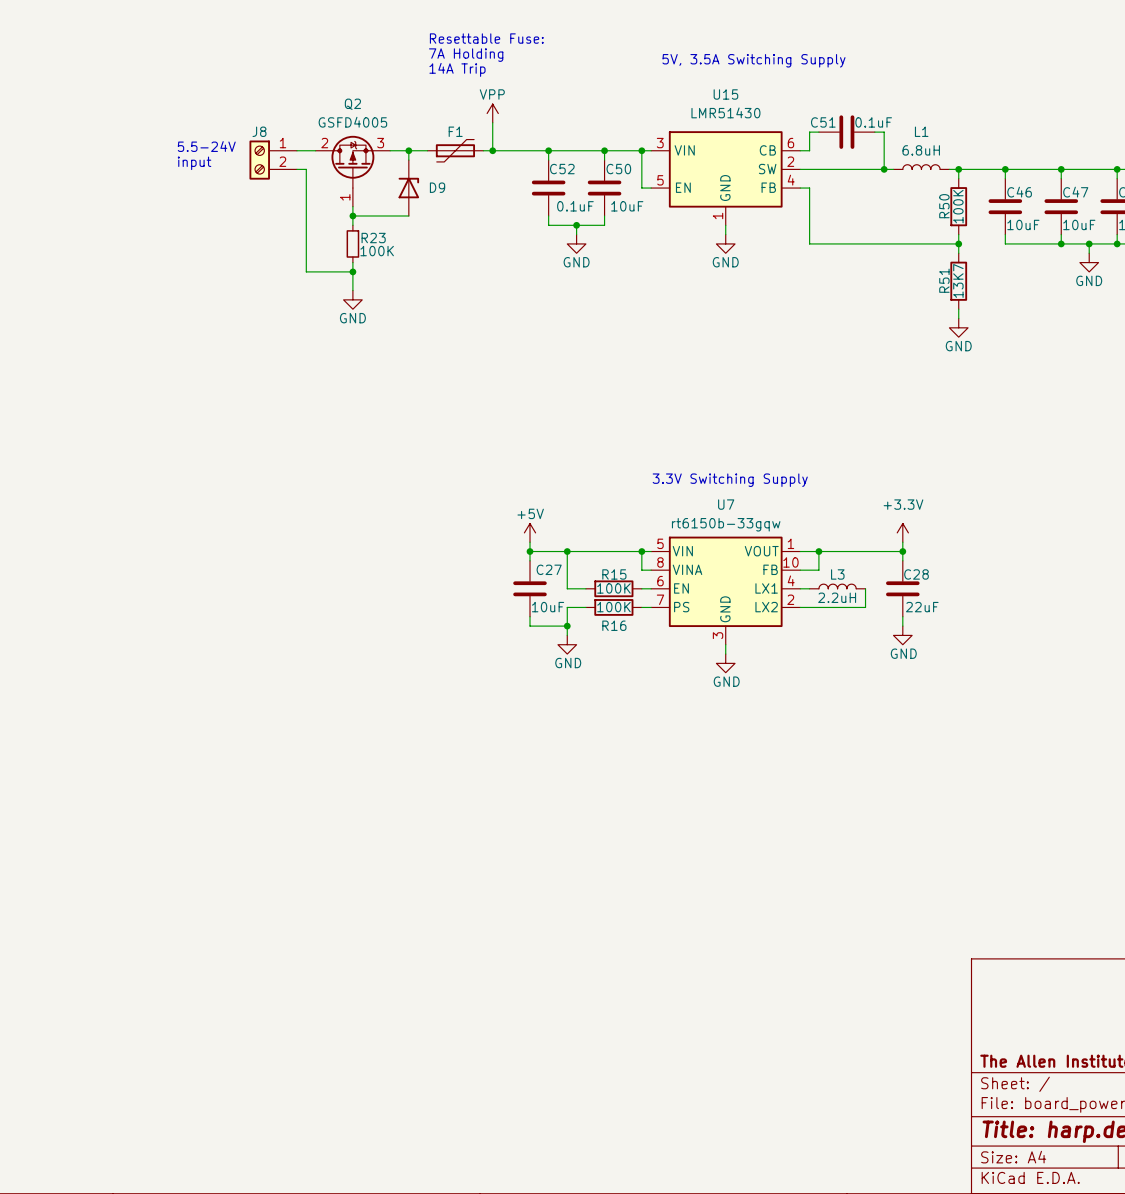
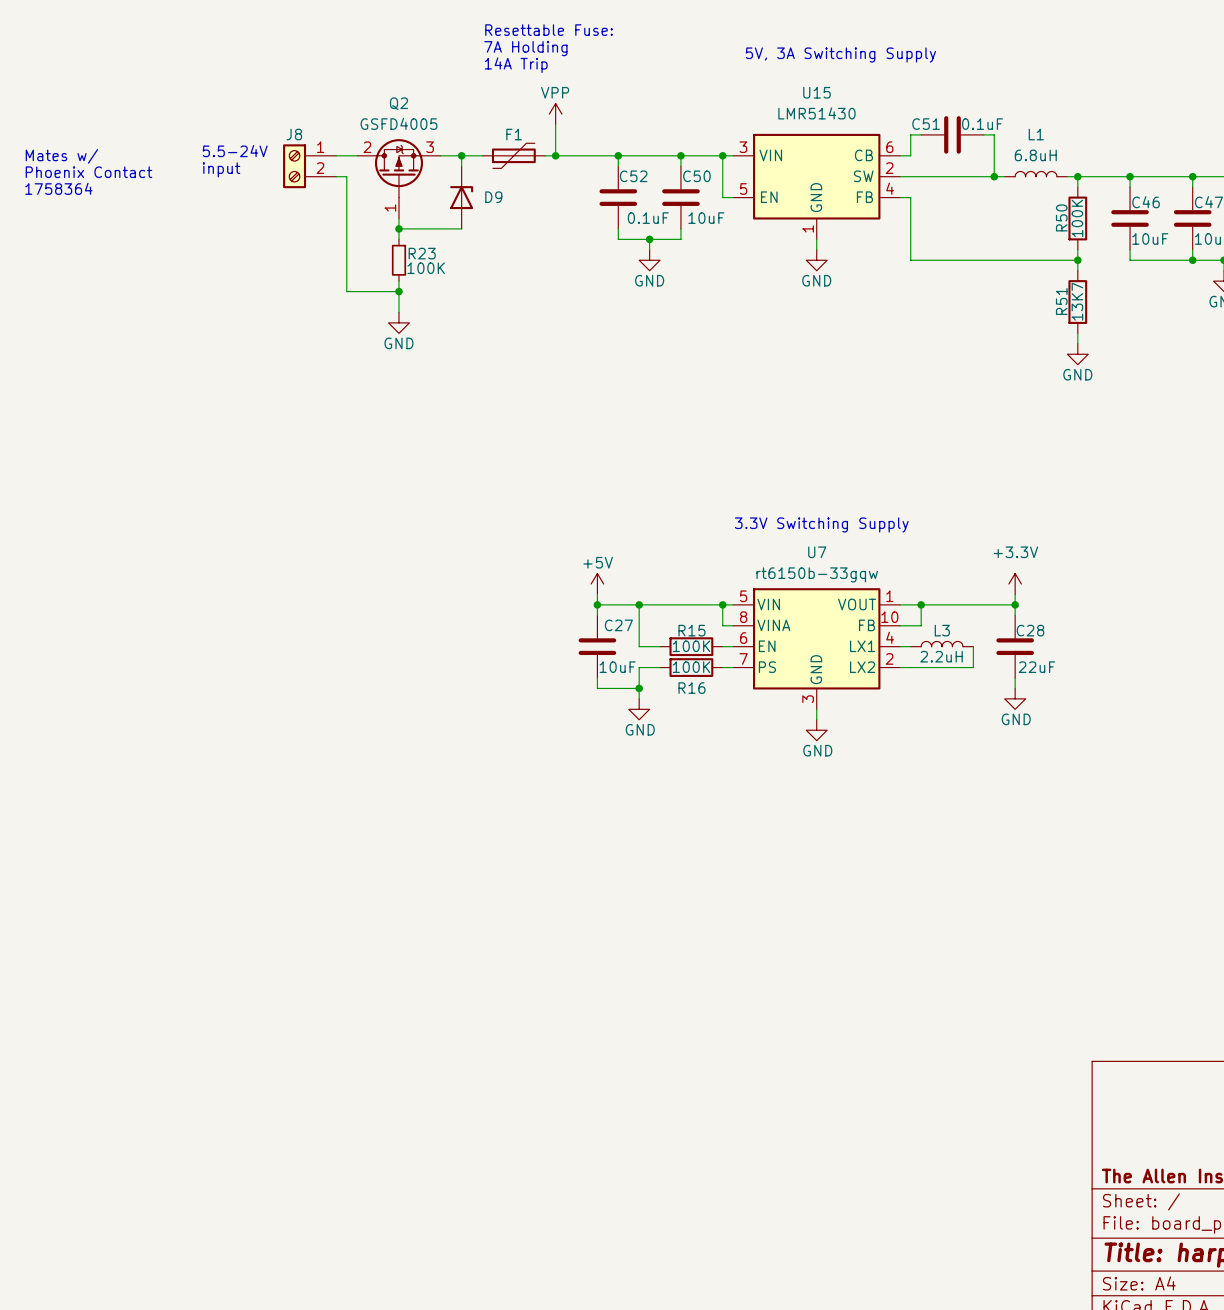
text: 5V, 3.5A Switching Supply (753, 60) -> 5V, 3A Switching Supply (840, 55)
text: none -> Mates w/ (61, 156)
text: none -> Phoenix Contact (88, 172)
text: none -> 1758364 (58, 188)

